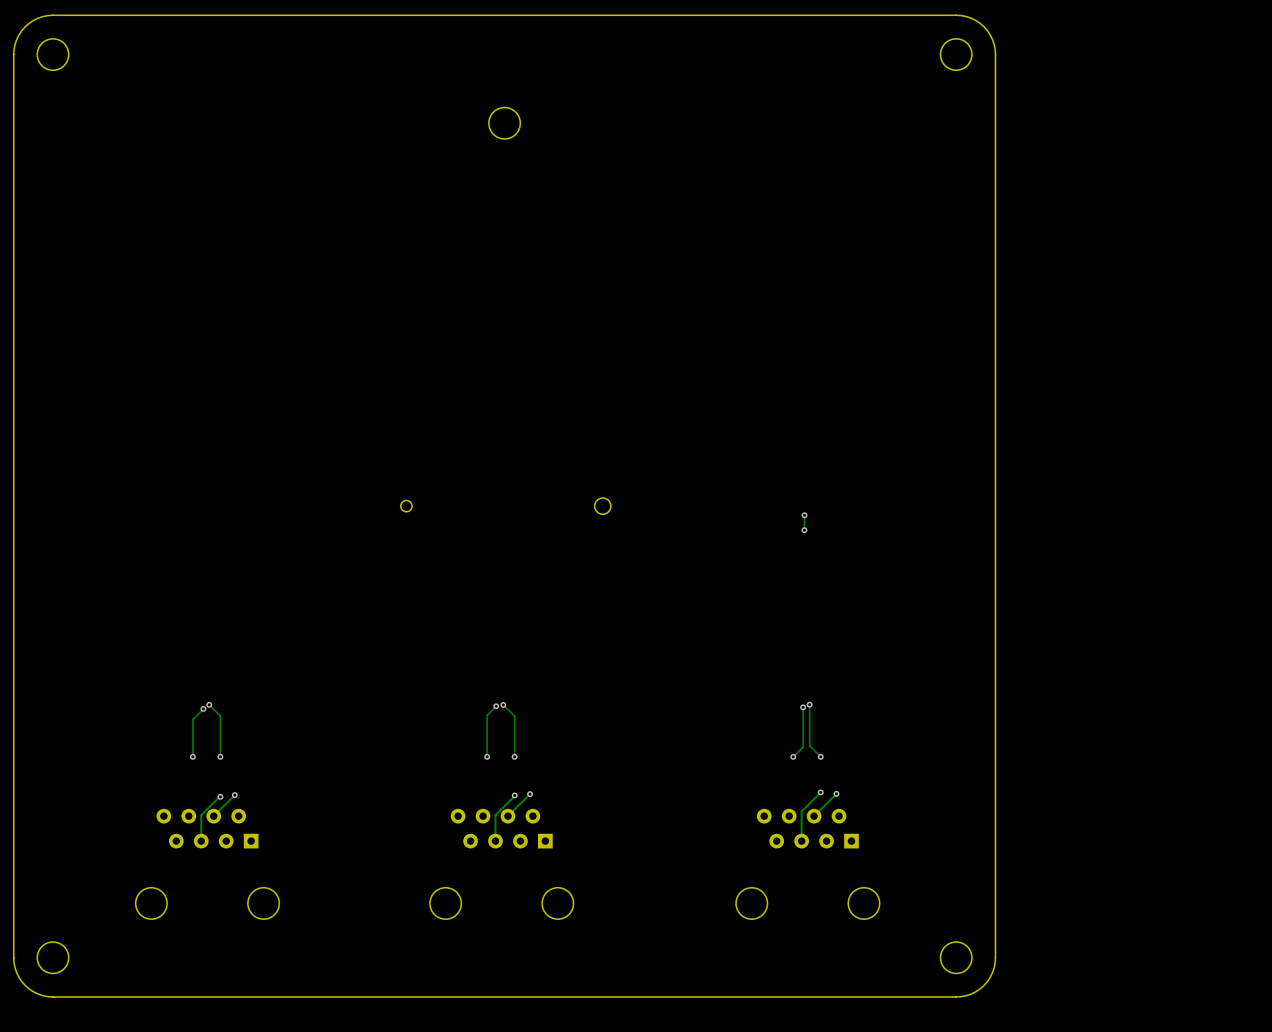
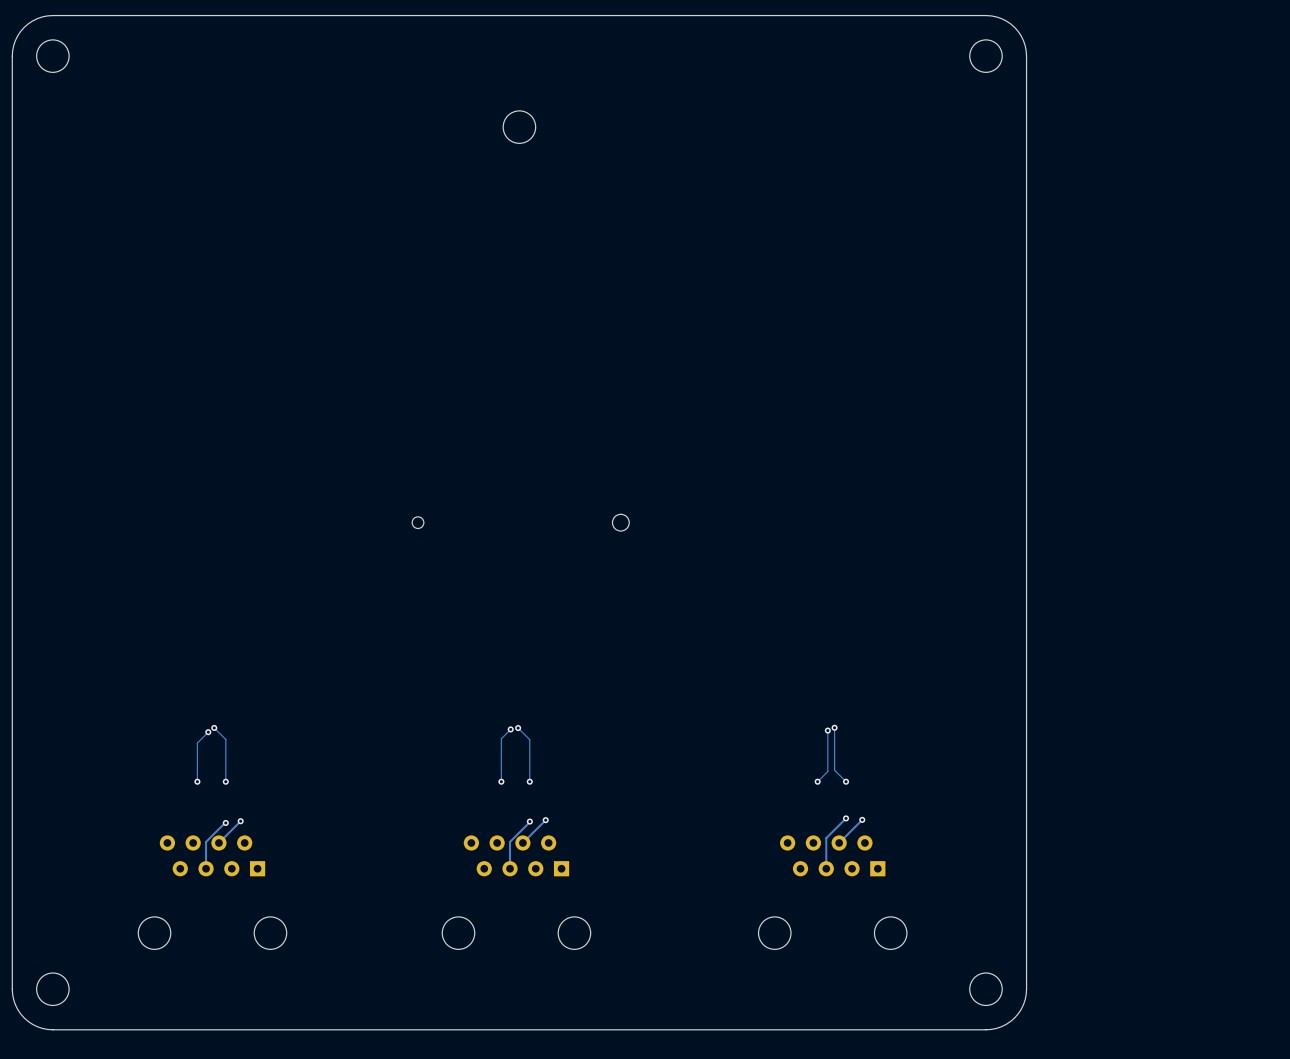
track: (804, 515) (804, 530) -> none
via: (804, 515) -> none
via: (804, 530) -> none

